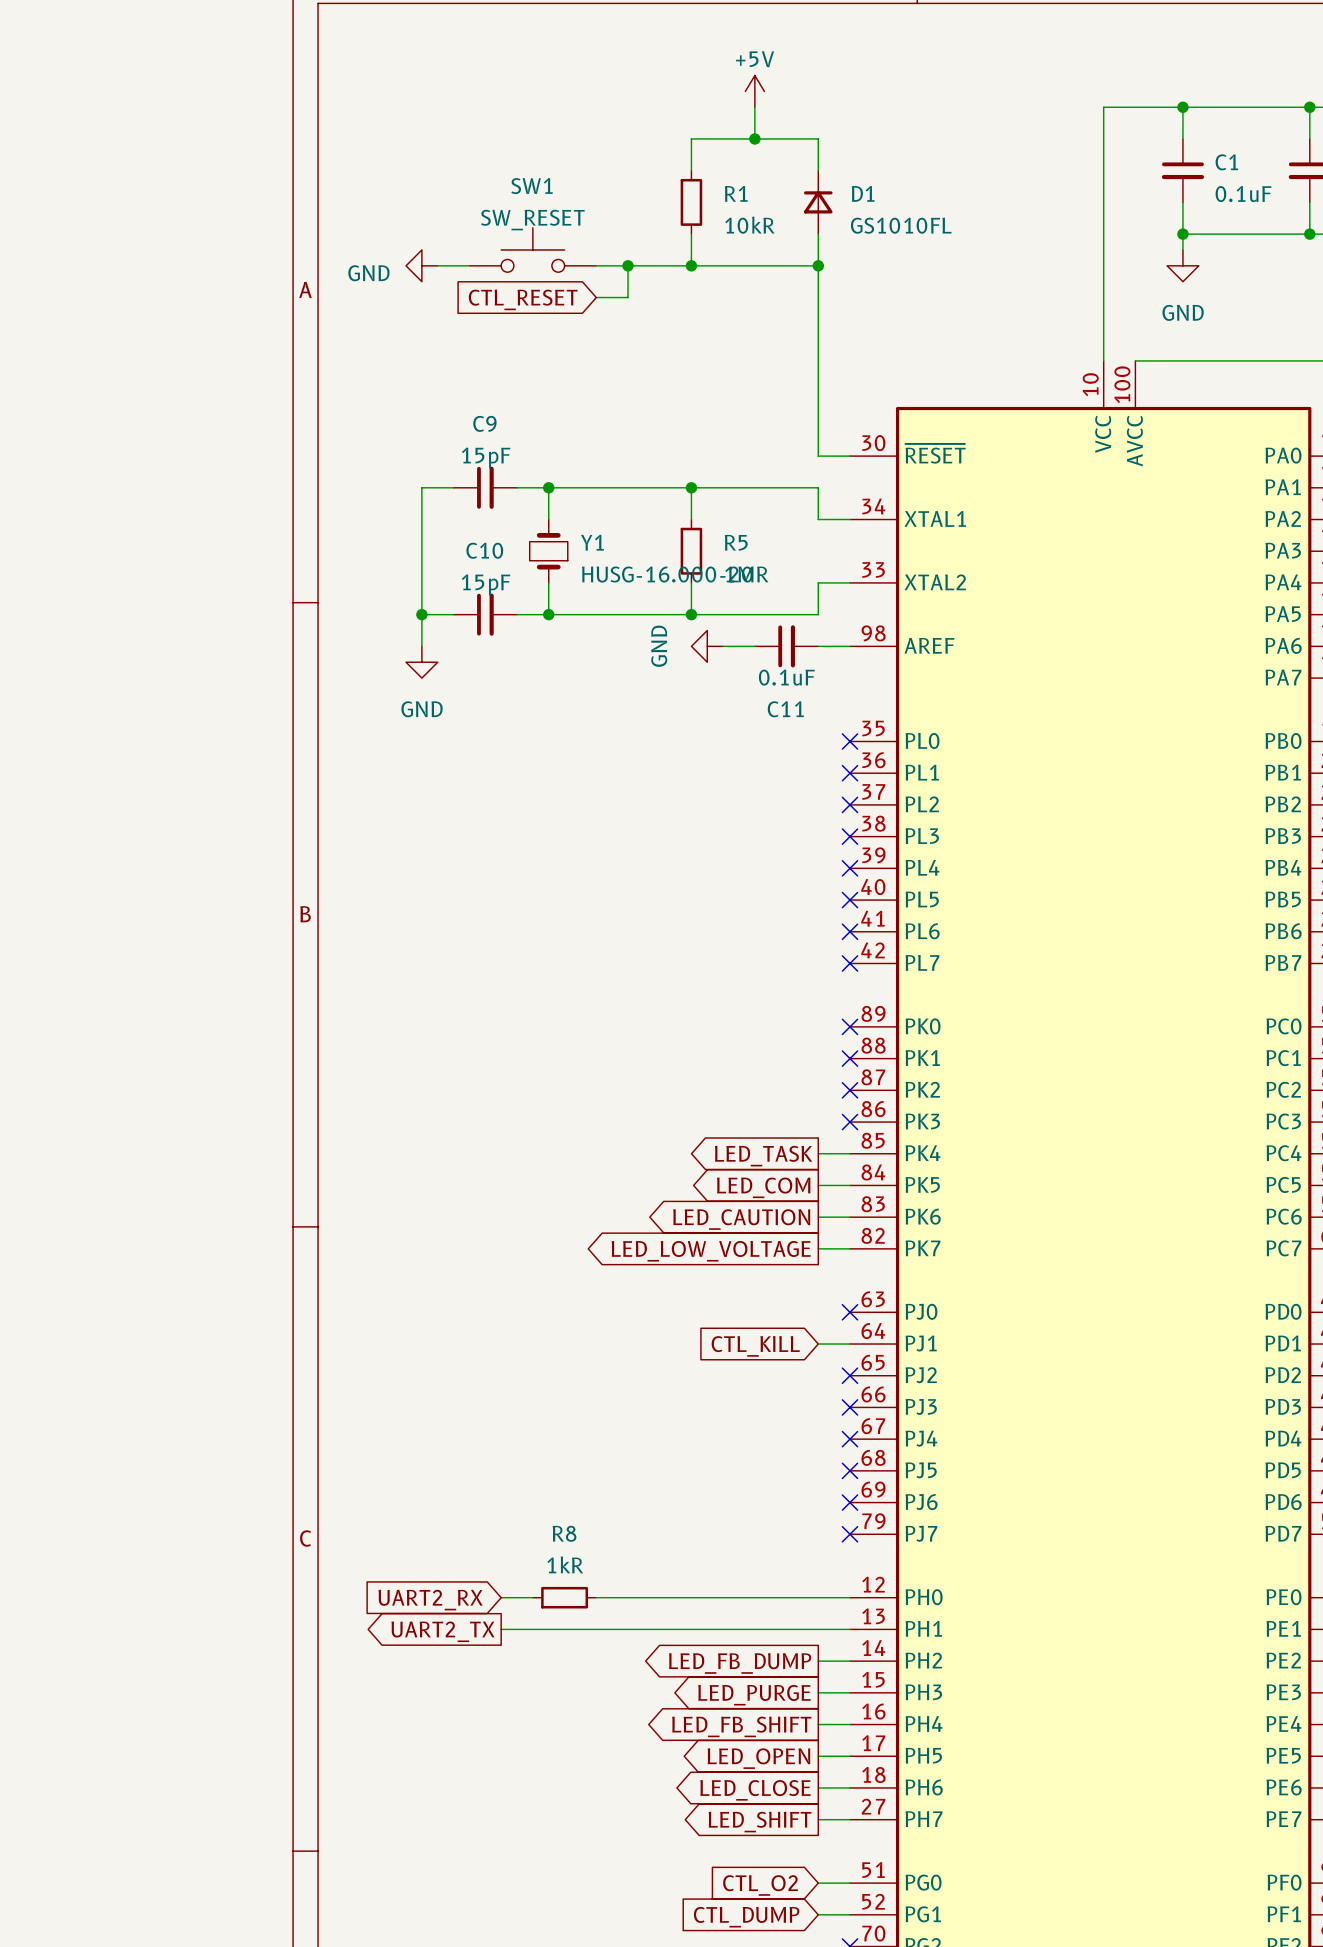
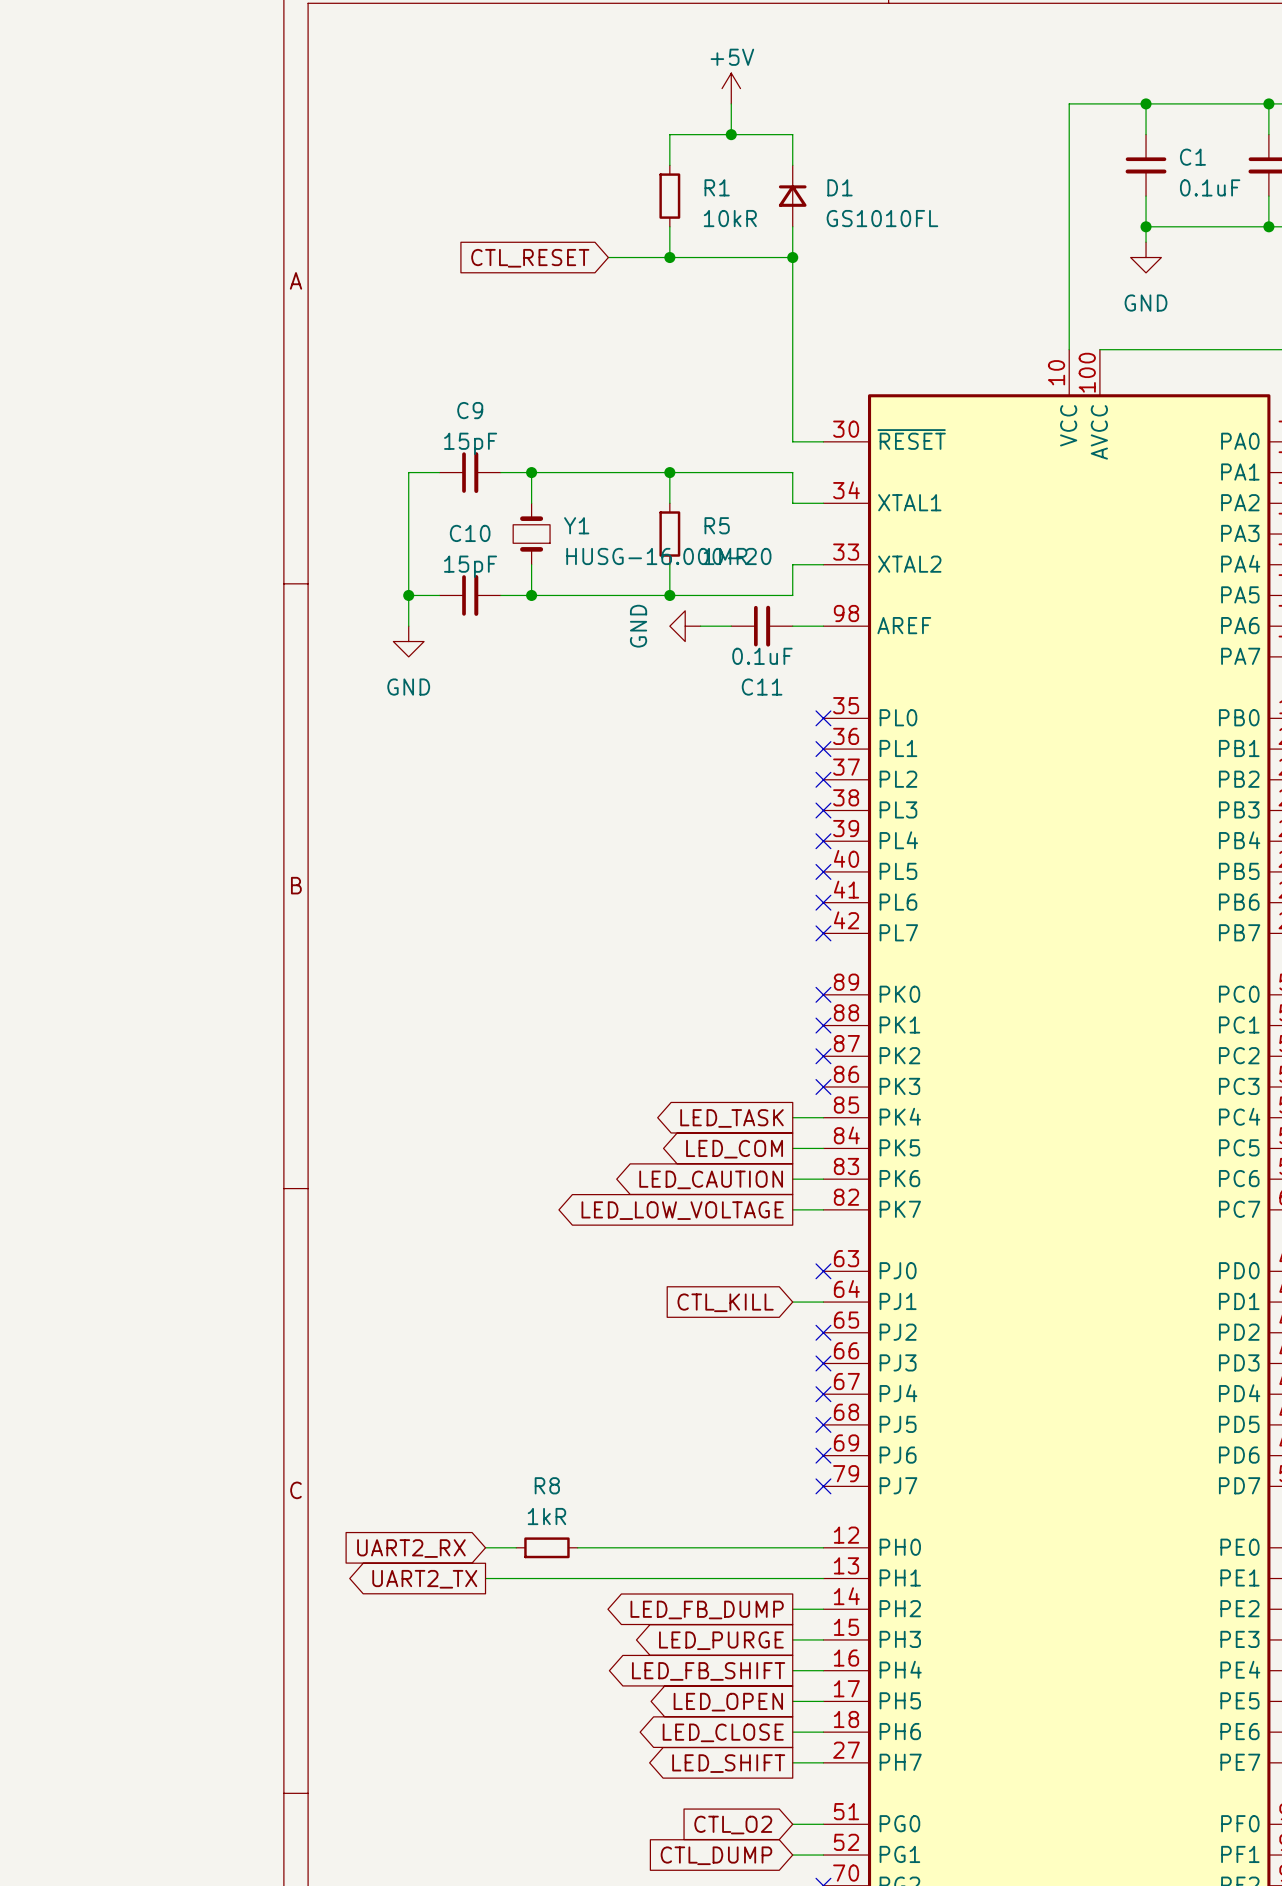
SW1: SW_RESET (532, 249) -> none
power symbol: GND (421, 265) -> none
wire: (437, 265) (469, 265) -> none
wire: (596, 265) (628, 265) (628, 297) (596, 297) -> none
junction: (628, 265) -> none
global label position: CTL_RESET (523, 299) -> CTL_RESET (530, 258)

